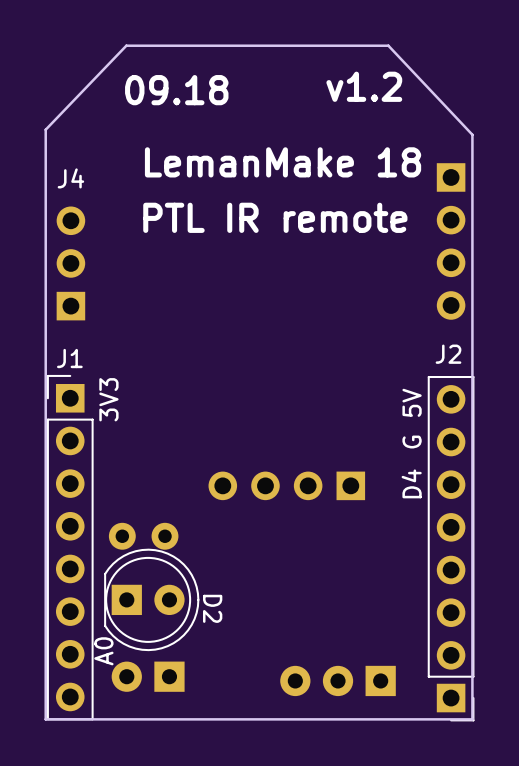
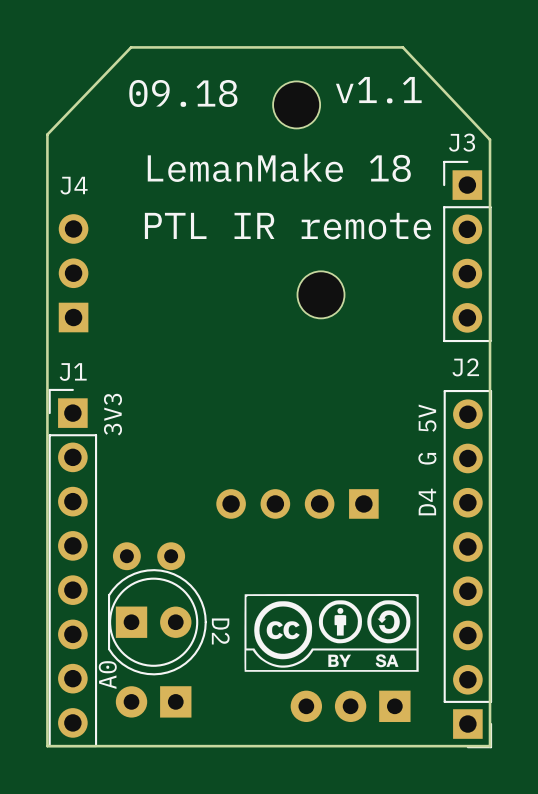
text: v1.2 (364, 86) -> v1.1 (378, 90)
part: none -> (296, 104)
J3 side: top (451, 241) -> bottom (467, 251)
part: none -> (320, 294)
drawing: none -> [244, 594, 419, 672]

